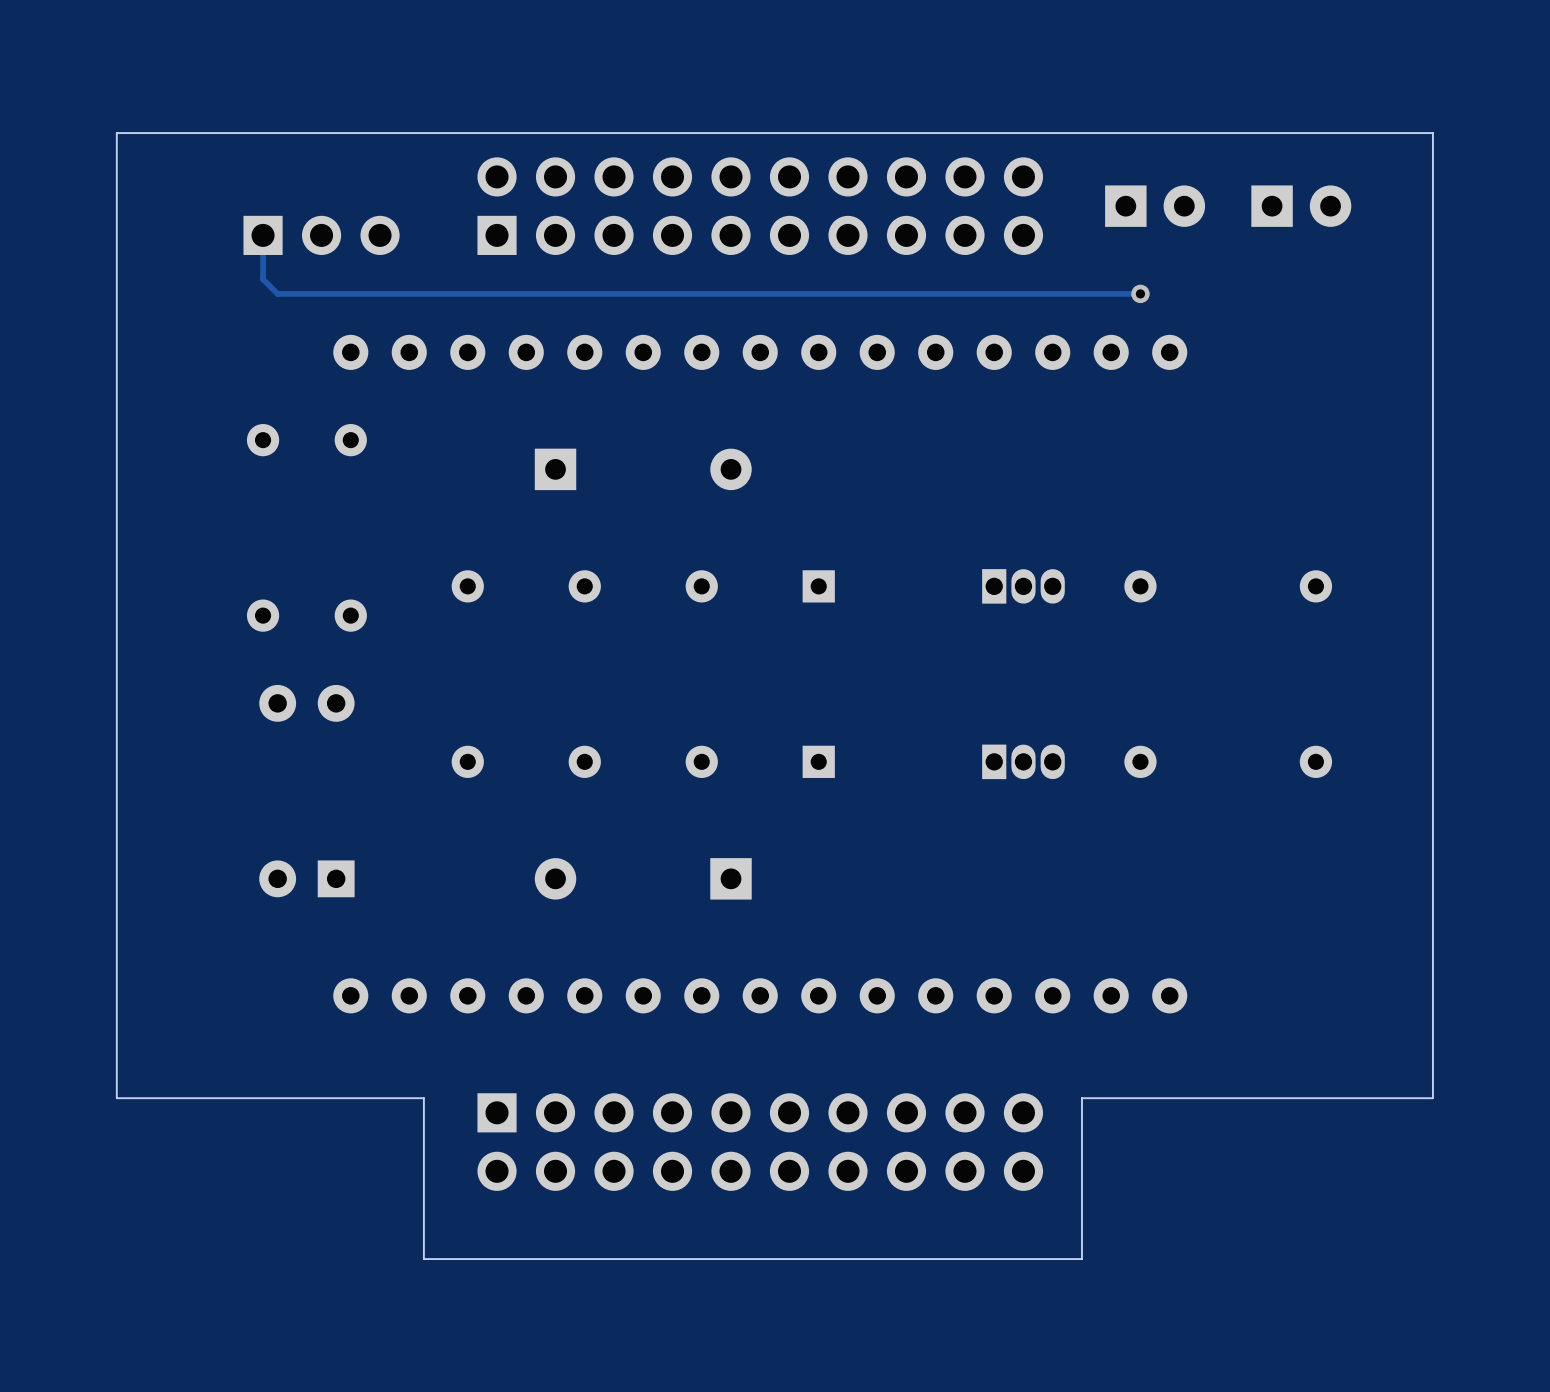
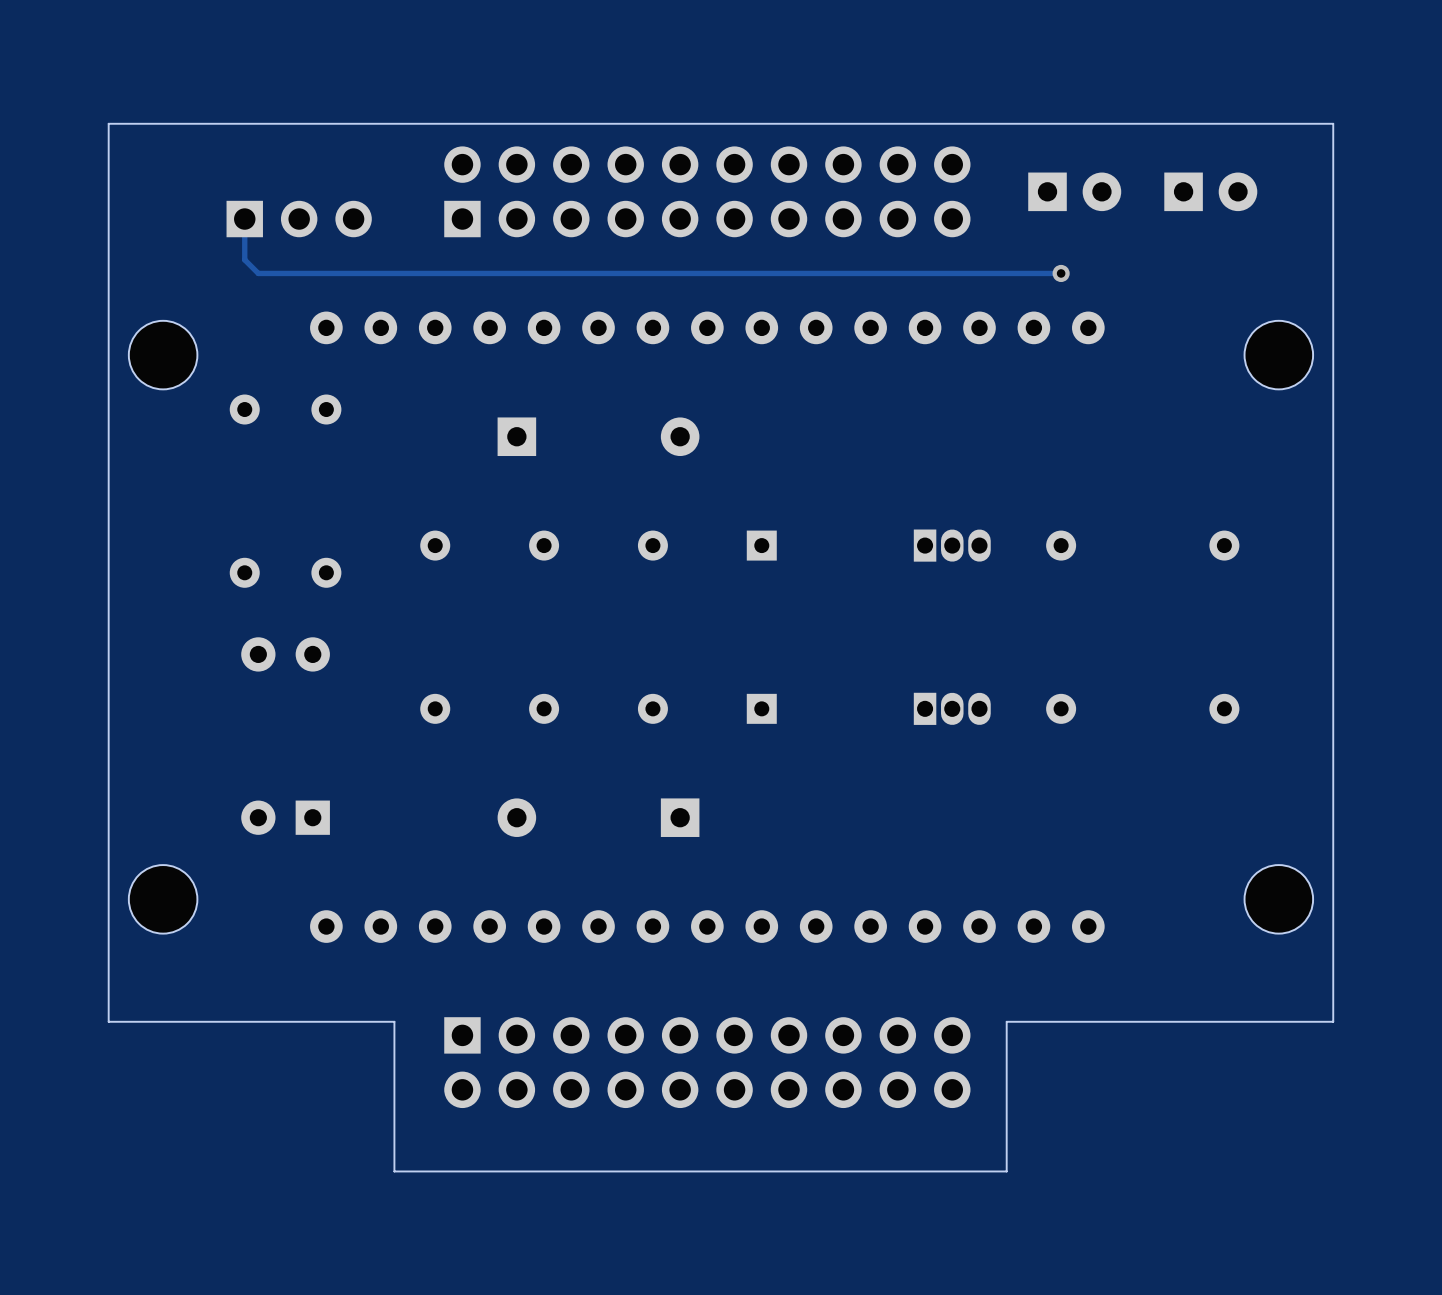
part: none -> (163, 355)
part: none -> (1278, 355)
part: none -> (163, 899)
part: none -> (1278, 899)

